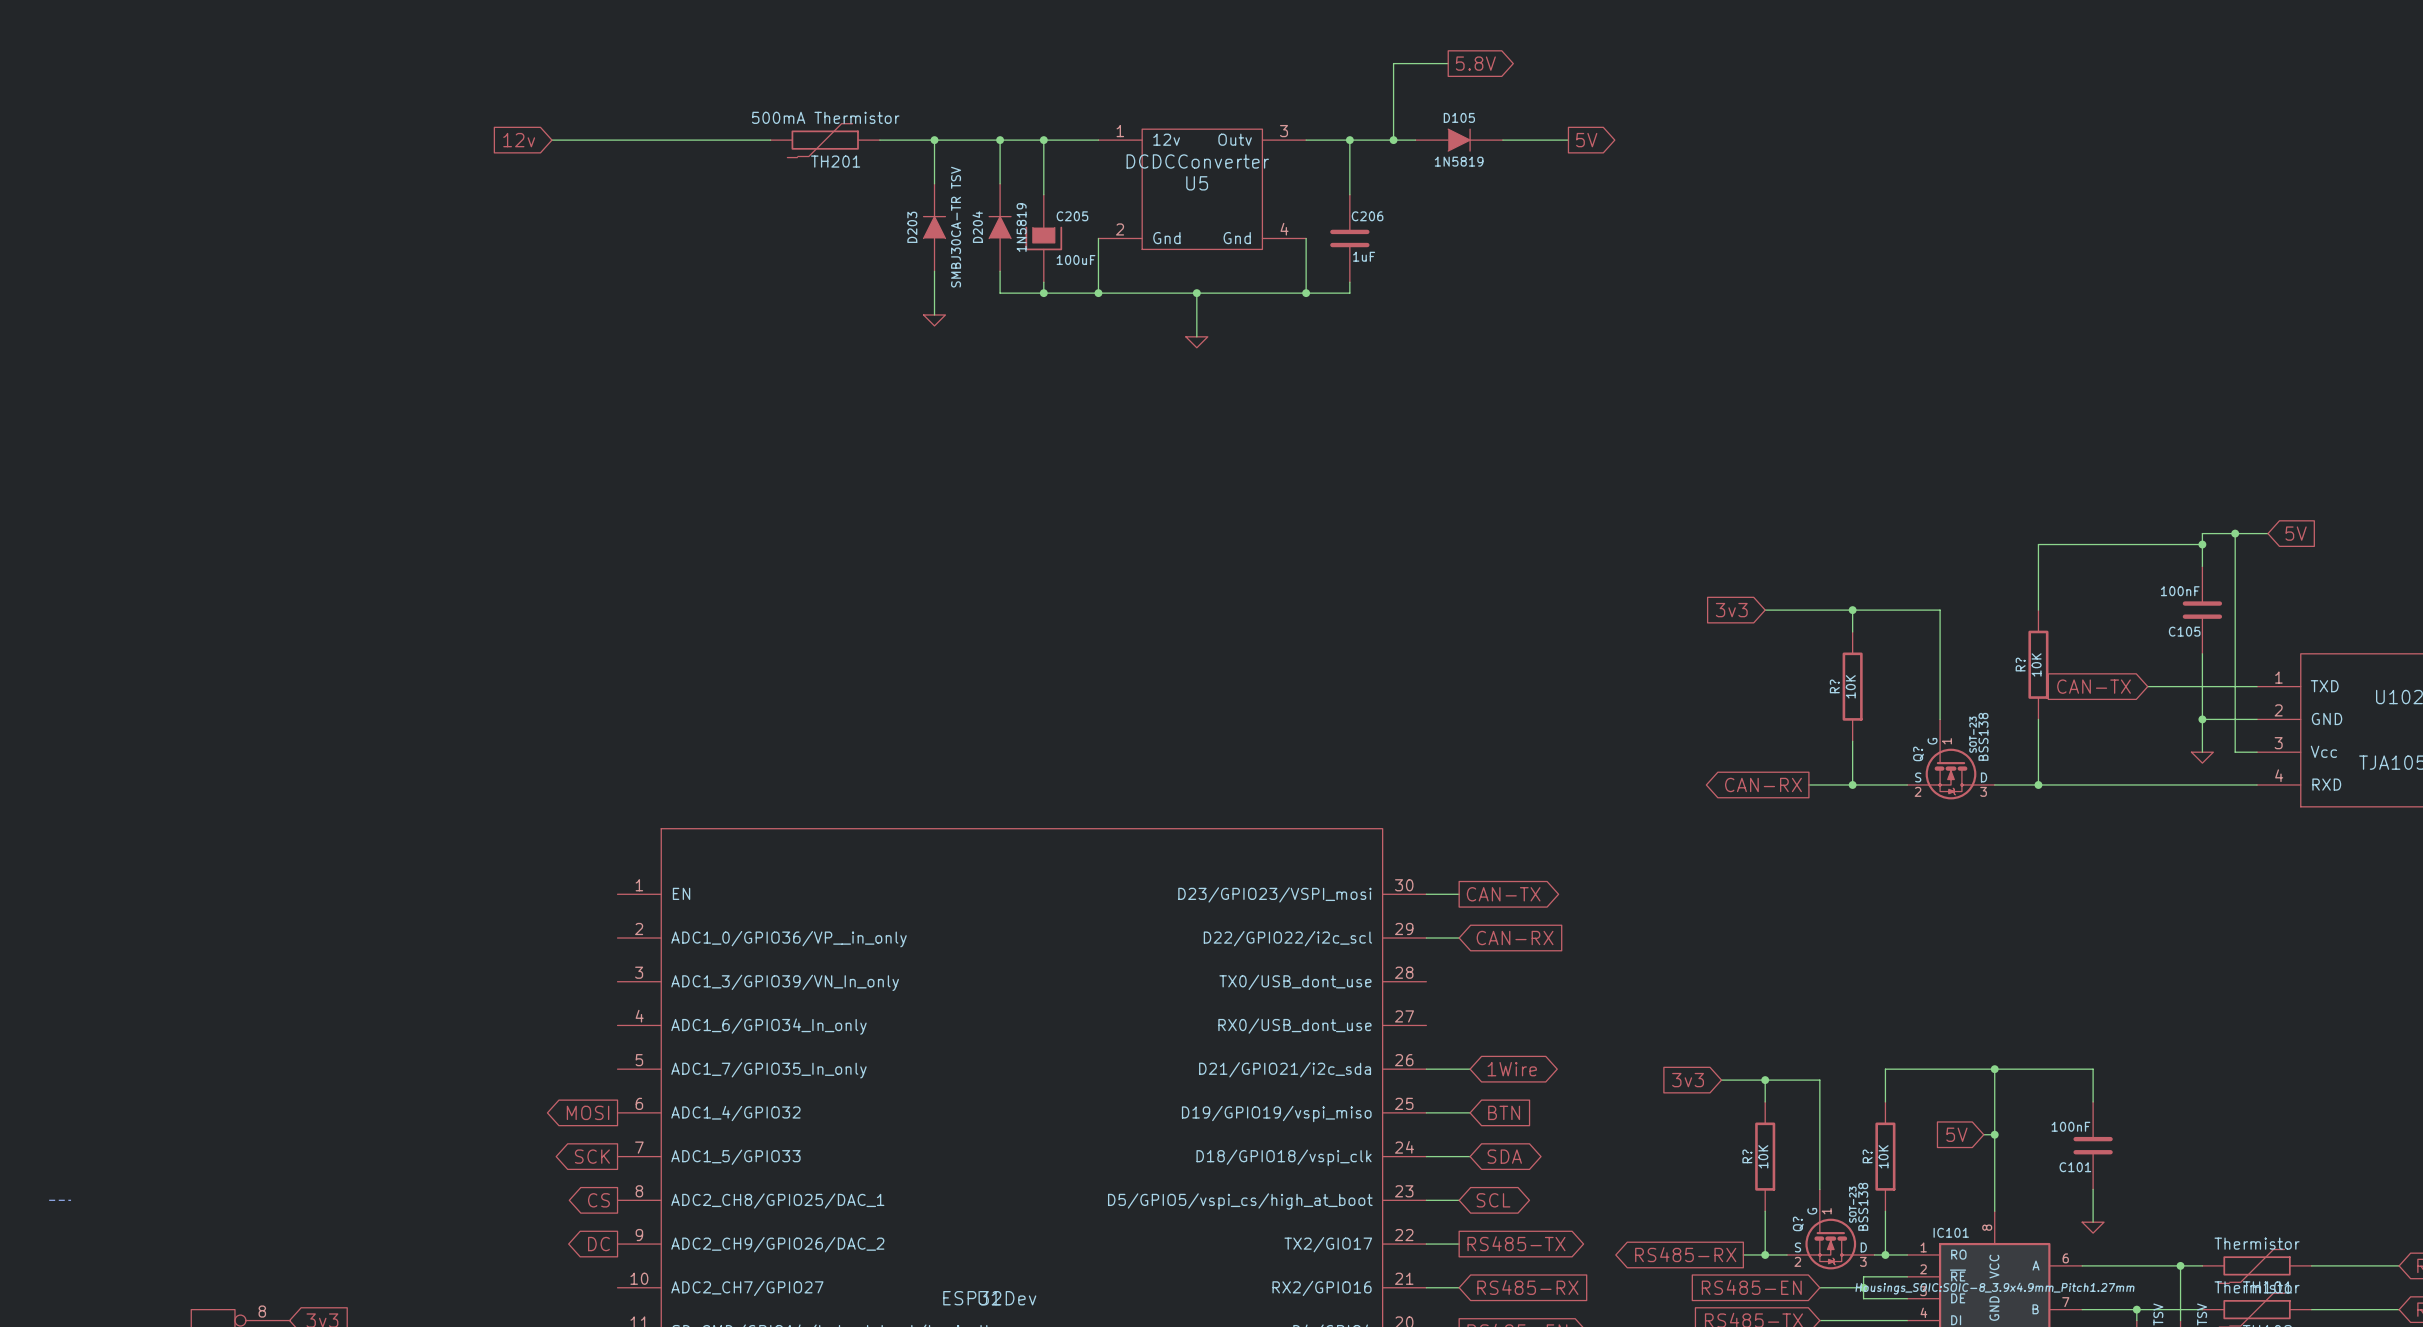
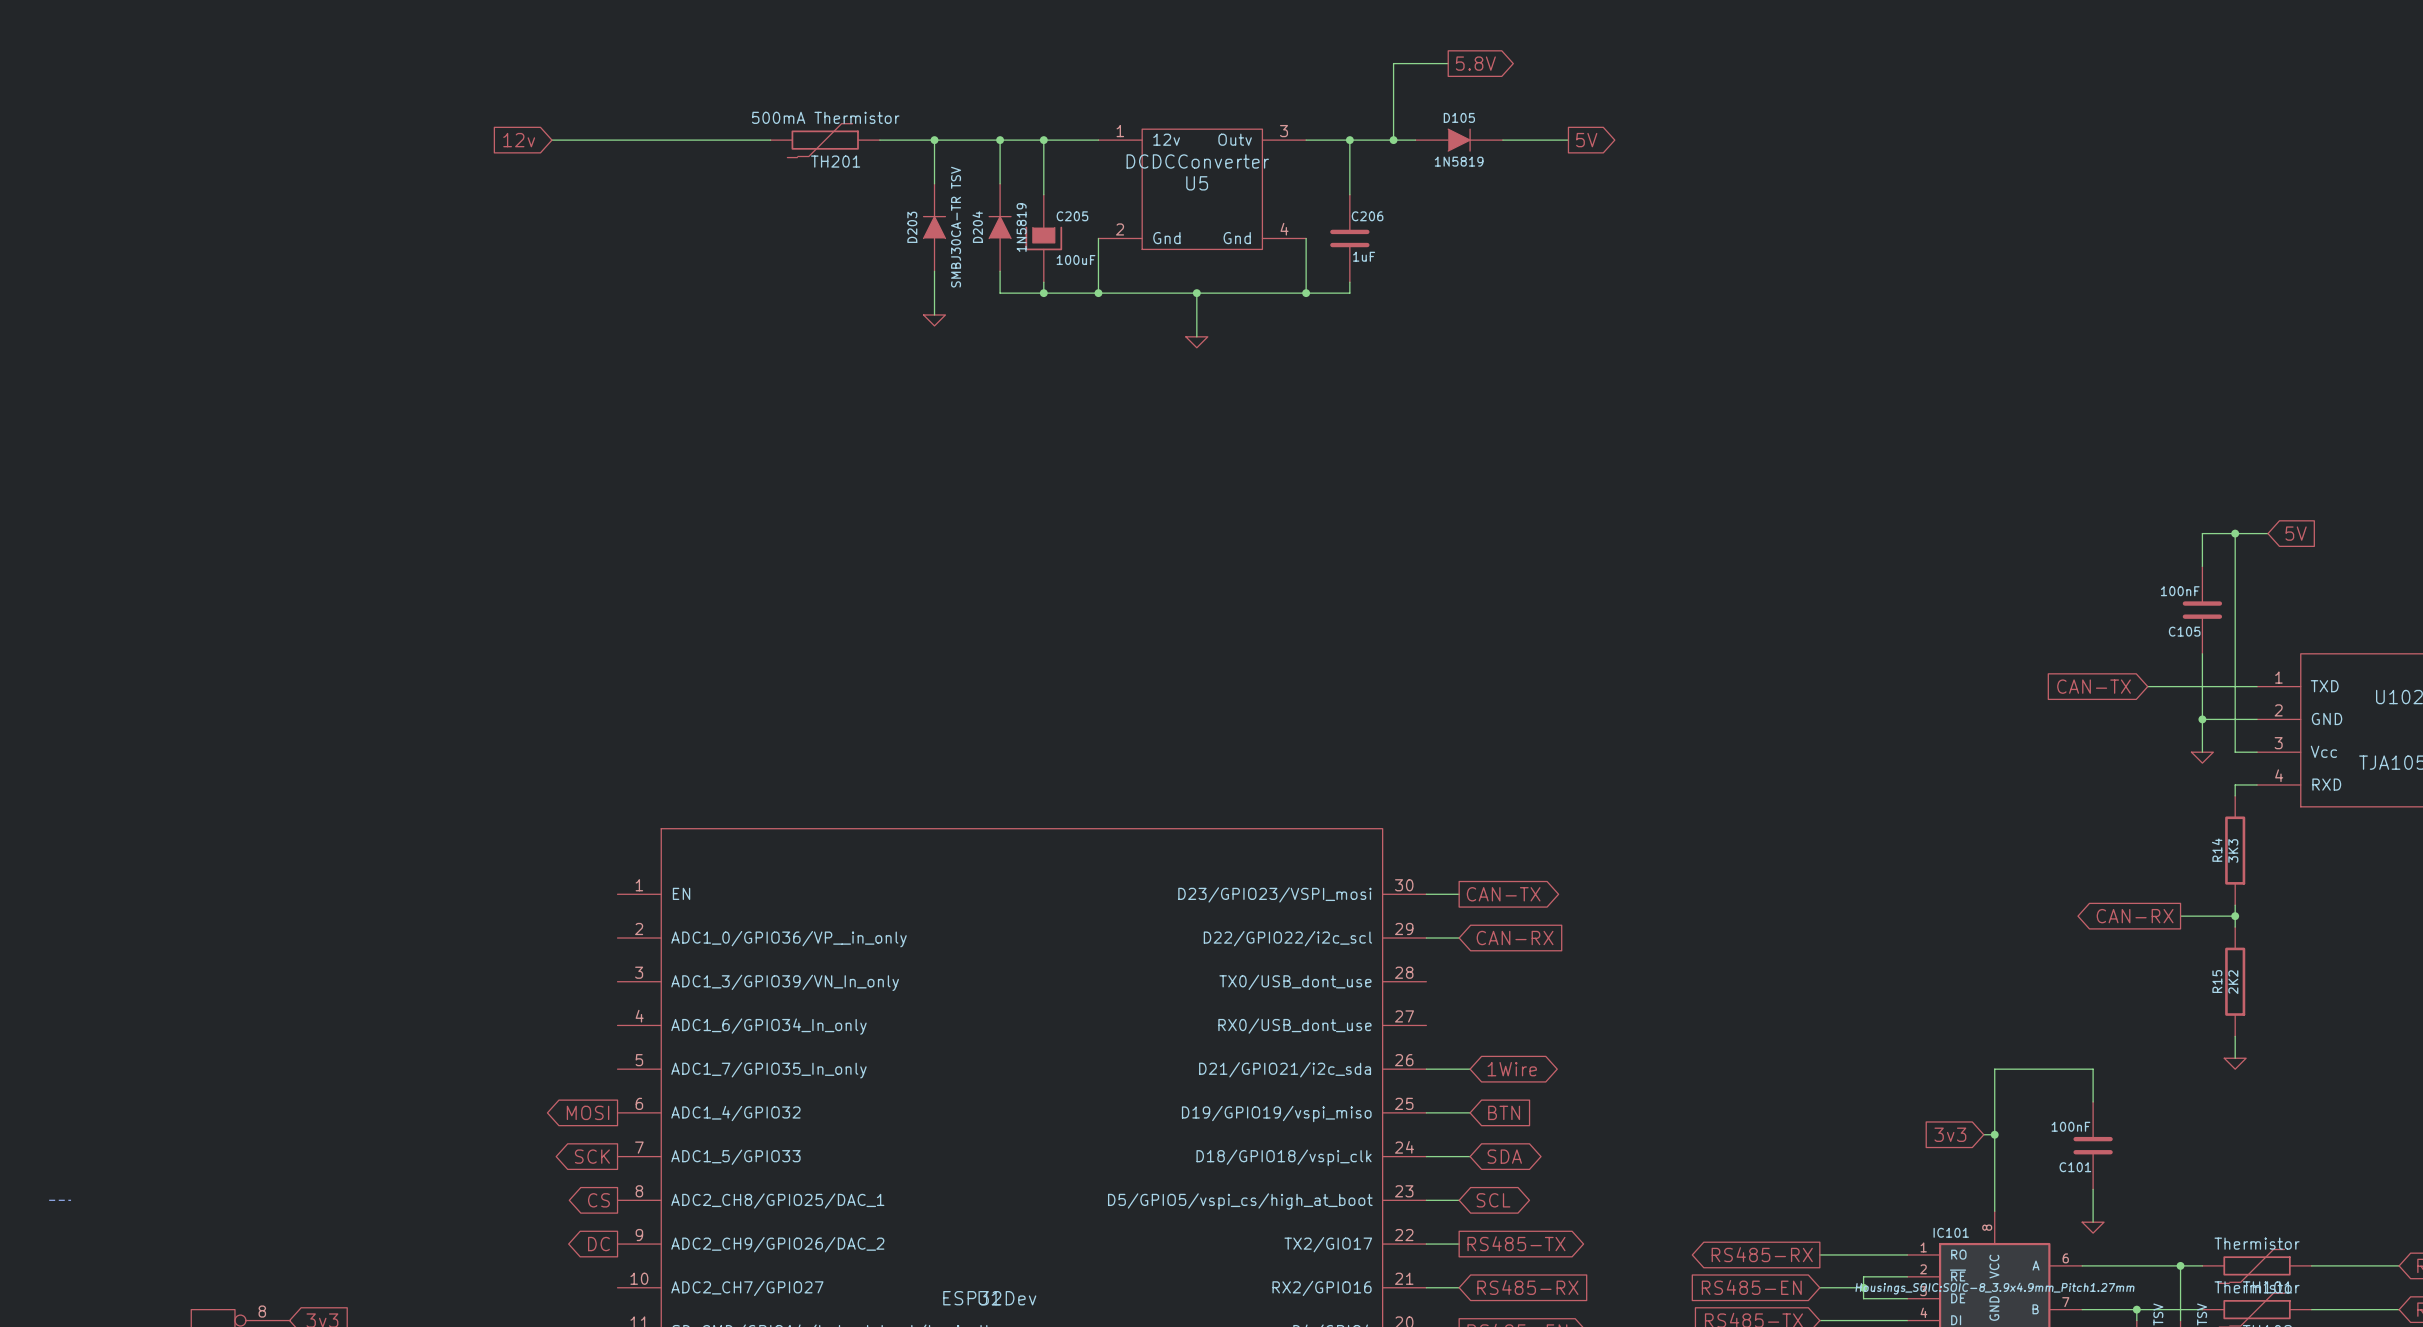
wire: (2202, 544) (2038, 544) (2038, 610) -> none
junction: (2202, 544) -> none
global label: 3v3 (1731, 610) -> none
wire: (1765, 610) (1940, 610) (1940, 719) -> none
wire: (1852, 610) (1852, 631) -> none
junction: (1852, 610) -> none
R?: 10K (2038, 664) -> none
R?: 10K (1852, 686) -> none
wire: (2038, 719) (2038, 784) -> none
wire: (1852, 741) (1852, 784) -> none
Q?: BSS138 (1951, 759) -> none
global label: CAN-RX (1763, 784) -> none
wire: (1808, 784) (1907, 784) -> none
junction: (1852, 784) -> none
wire: (1994, 784) (2235, 784) -> (2235, 795) (2235, 784)
junction: (2038, 784) -> none
R14: none -> 3K3 (2235, 850)
wire: none -> (2235, 905) (2235, 927)
global label: none -> CAN-RX (2135, 916)
wire: none -> (2180, 916) (2235, 916)
junction: none -> (2235, 916)
R15: none -> 2K2 (2235, 981)
wire: none -> (2235, 1036) (2235, 1058)
power symbol: none -> (2235, 1063)
wire: (1994, 1069) (1885, 1069) (1885, 1101) -> none
junction: (1994, 1069) -> none
global label: 3v3 (1688, 1080) -> none
wire: (1721, 1080) (1819, 1080) (1819, 1189) -> none
wire: (1765, 1080) (1765, 1101) -> none
junction: (1765, 1080) -> none
global label: 5V (1956, 1134) -> 3v3 (1950, 1134)
R?: 10K (1765, 1156) -> none
R?: 10K (1885, 1156) -> none
wire: (1765, 1211) (1765, 1254) -> none
wire: (1885, 1211) (1885, 1254) -> none
Q?: BSS138 (1830, 1229) -> none
global label position: RS485-RX (1685, 1254) -> RS485-RX (1762, 1254)
wire: (1743, 1254) (1787, 1254) -> none
junction: (1765, 1254) -> none
junction: (1885, 1254) -> none

